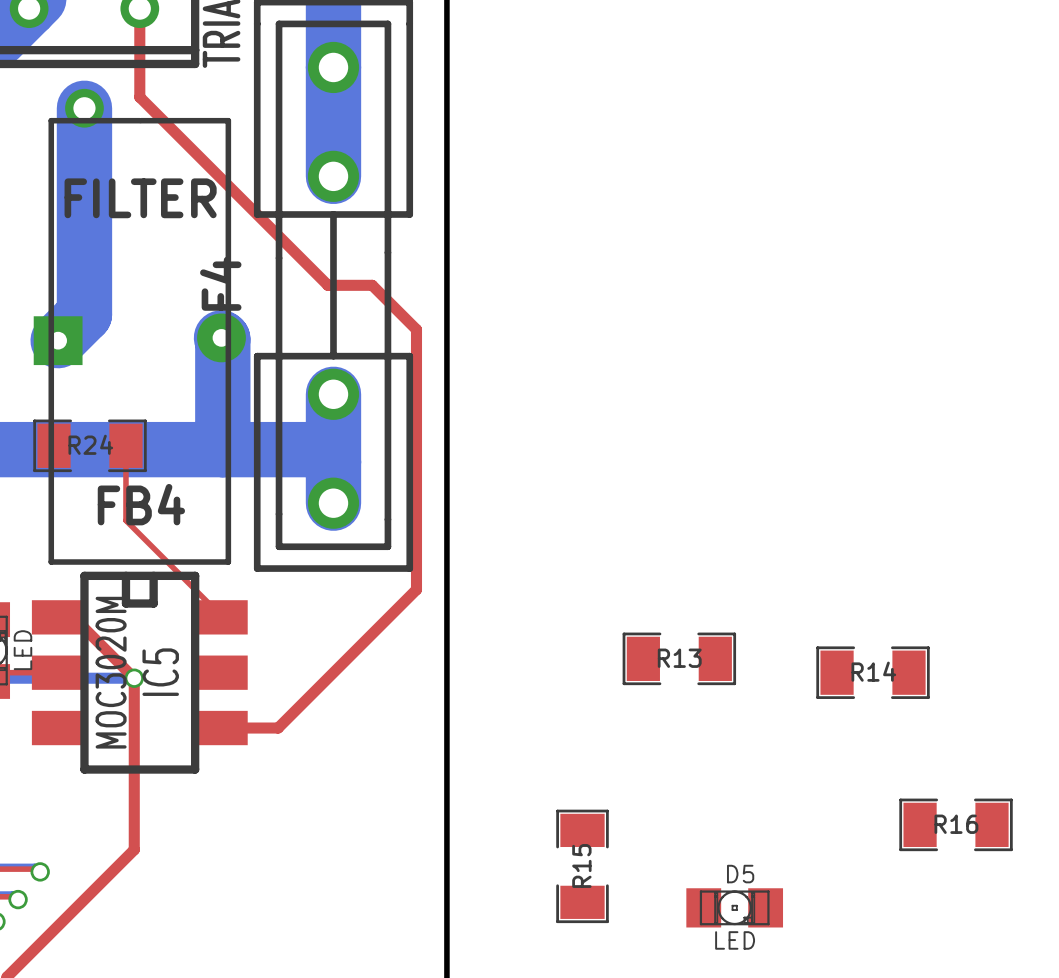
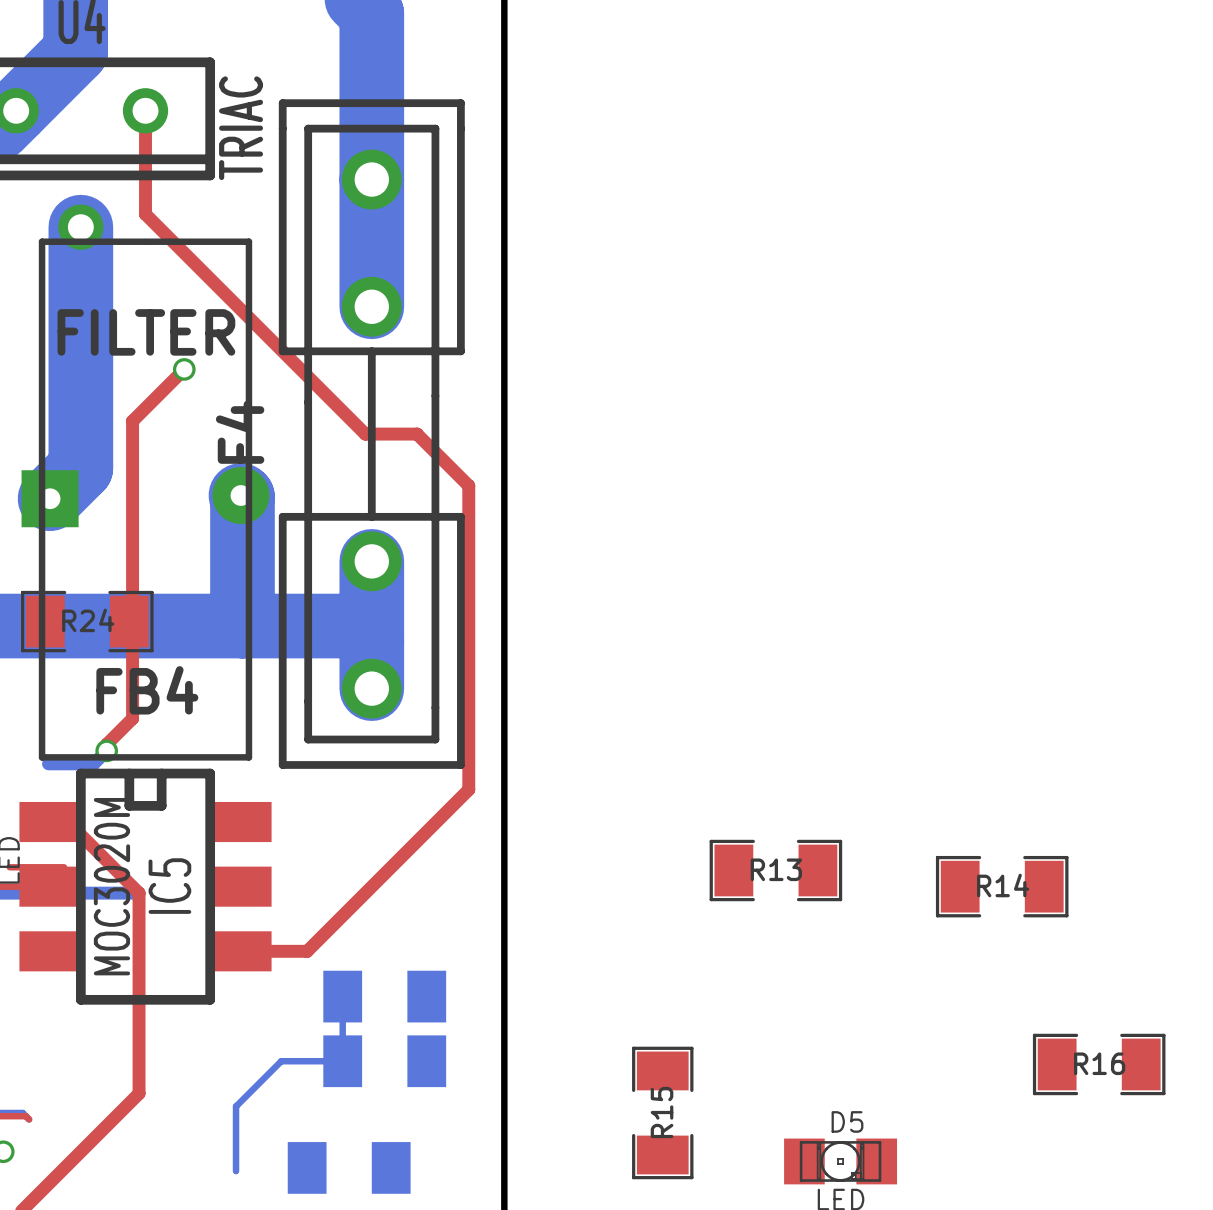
top track: none -> (184, 369) (132, 421) (132, 718) (106, 744) (106, 750)
via: none -> (184, 369)
top track: (125, 445) (125, 520) (222, 617) -> none
bottom track: none -> (106, 750) (93, 763) (48, 763)
via: none -> (106, 750)
top track: none -> (9, 867) (64, 867)
via: (134, 678) -> none
bottom track: none -> (342, 996) (342, 1061) (281, 1061) (236, 1106) (236, 1171)
part: none -> (384, 996)
part: none -> (384, 1061)
via: (40, 871) -> none
part: none -> (349, 1167)

